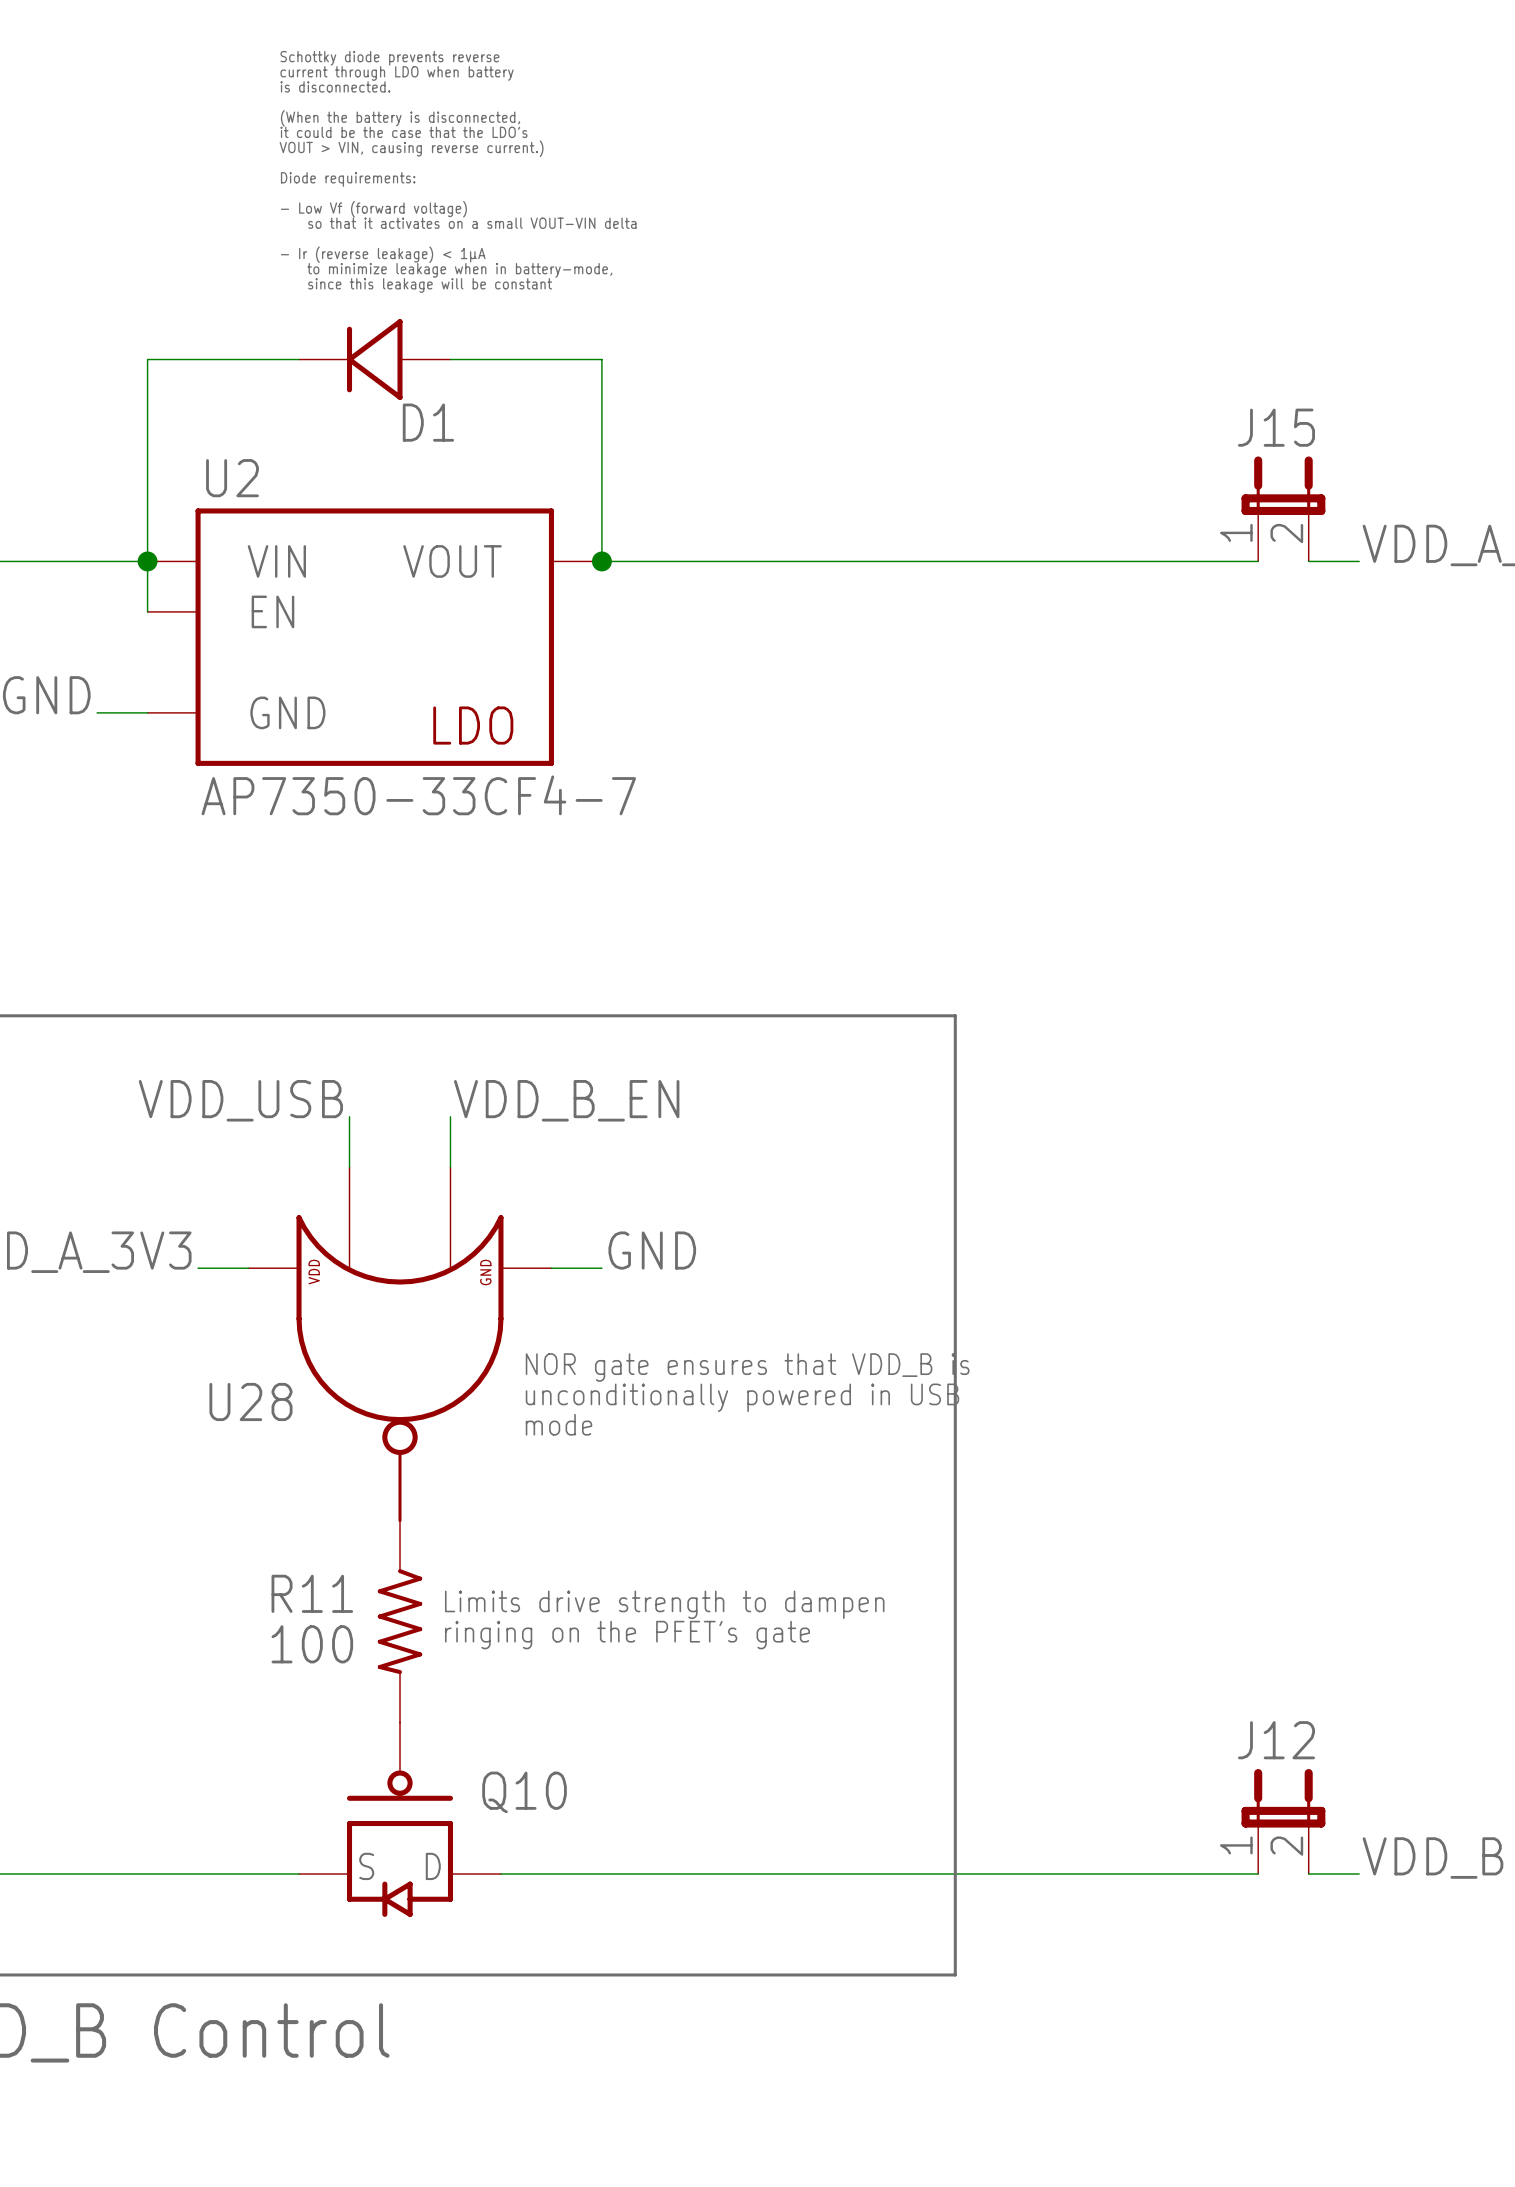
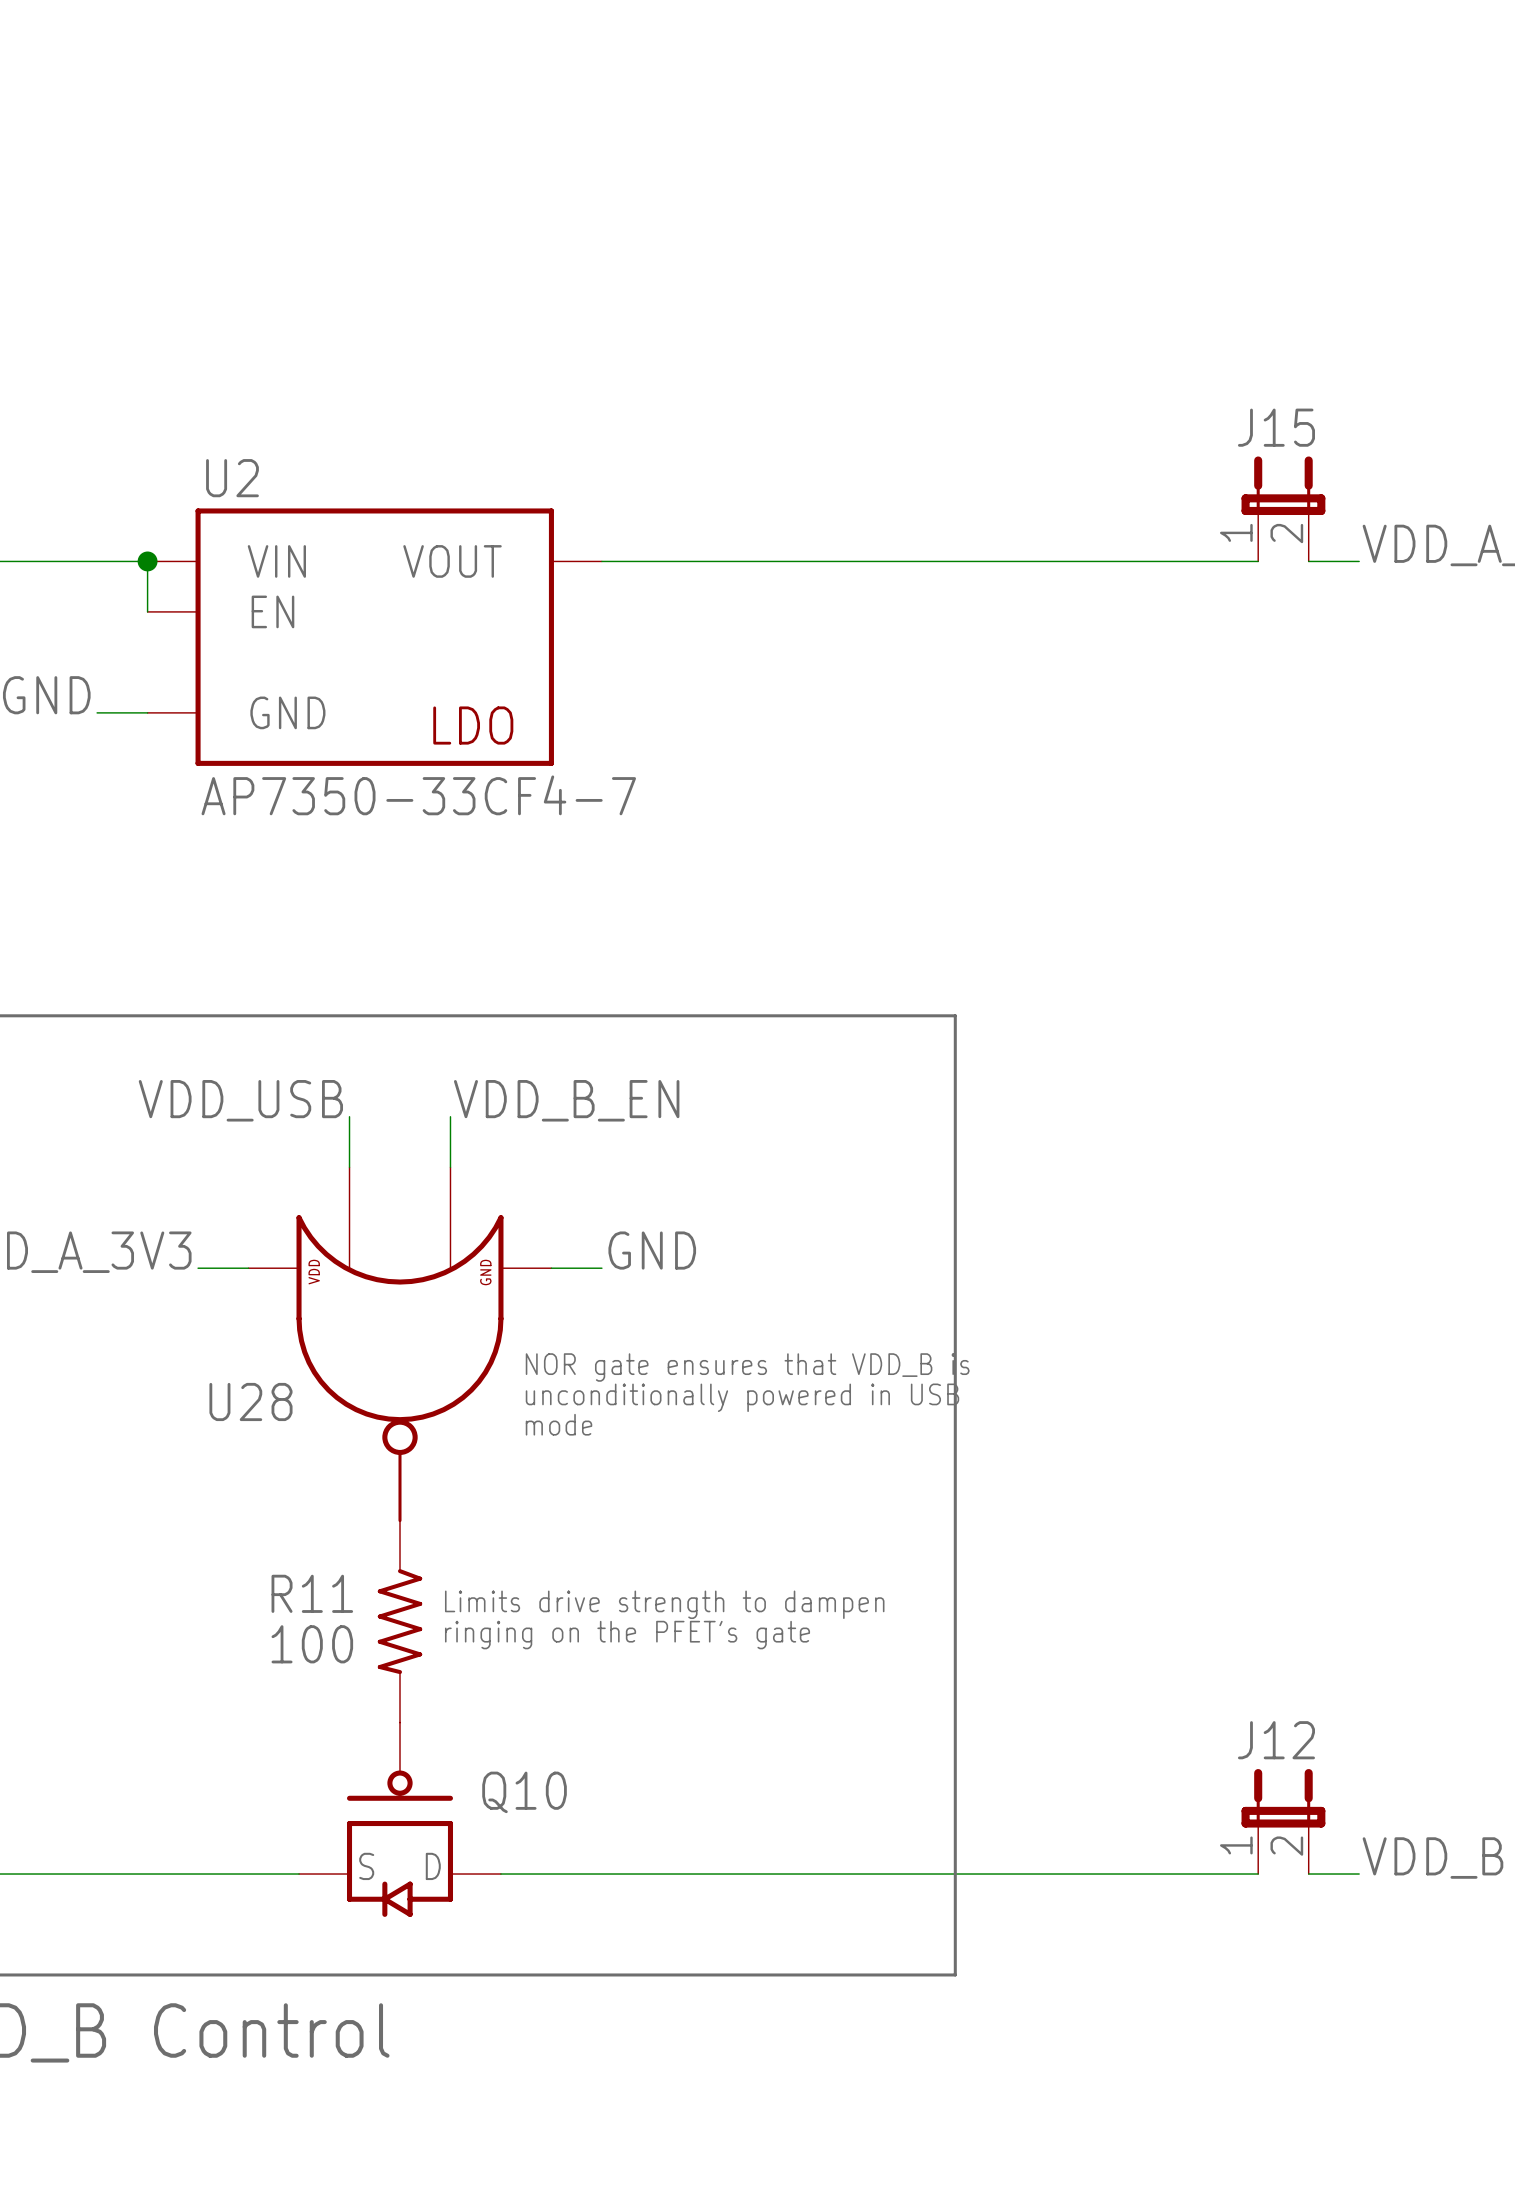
text: Schottky diode prevents reverse (389, 58) -> none
text: current through LDO when battery (397, 73) -> none
text: is disconnected. (335, 86) -> none
text: (When the battery is disconnected, (400, 118) -> none
text: it could be the case that the LDO's (403, 132) -> none
text: VOUT > VIN, causing reverse current.) (411, 148) -> none
text: Diode requirements: (348, 179) -> none
text: - Low Vf (forward voltage) (373, 209) -> none
text: so that it activates on a small VOUT-VIN delta (472, 223) -> none
text: - Ir (reverse leakage) < 1µA (383, 254) -> none
text: to minimize leakage when in battery-mode, (459, 270) -> none
text: since this leakage will be constant (430, 285) -> none
wire: (299, 359) (147, 359) (147, 561) -> none
D1: (374, 359) -> none
wire: (450, 359) (601, 359) (601, 561) -> none
junction: (601, 561) -> none

